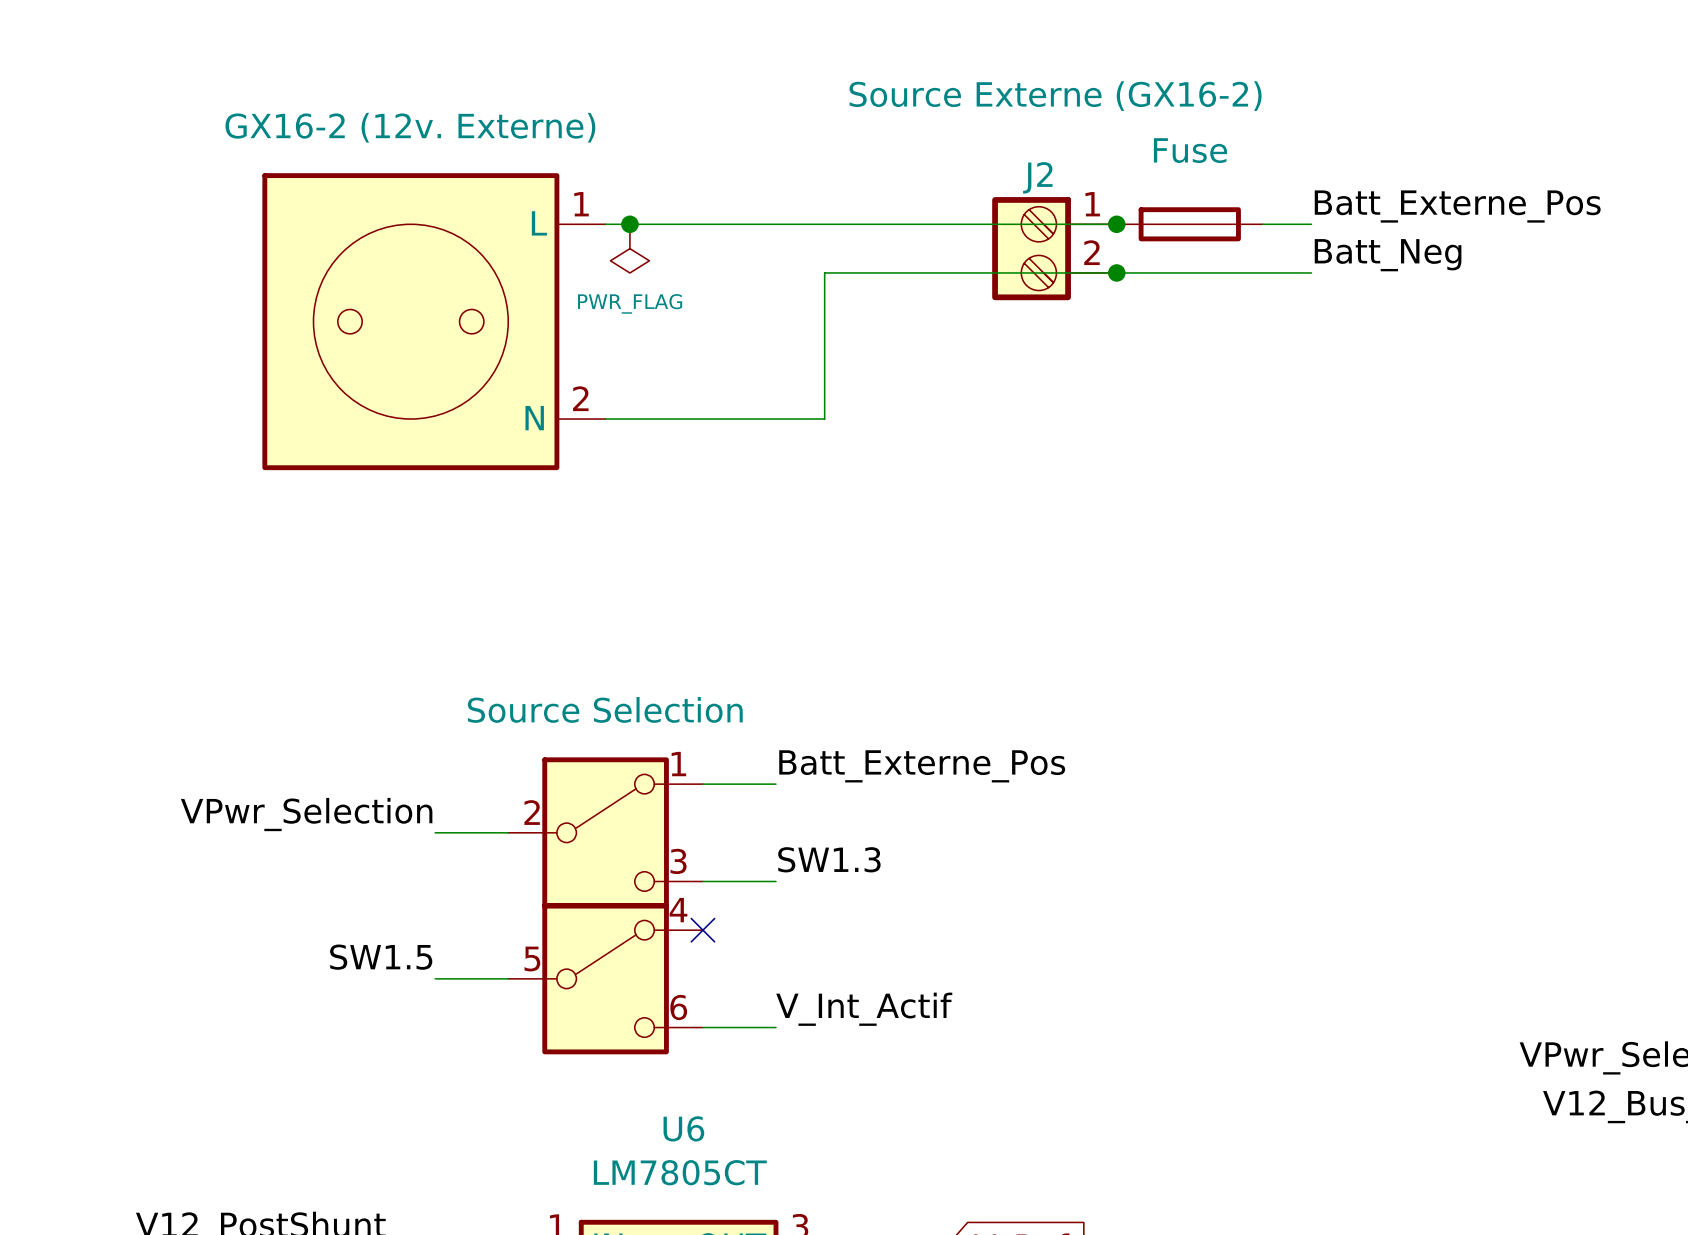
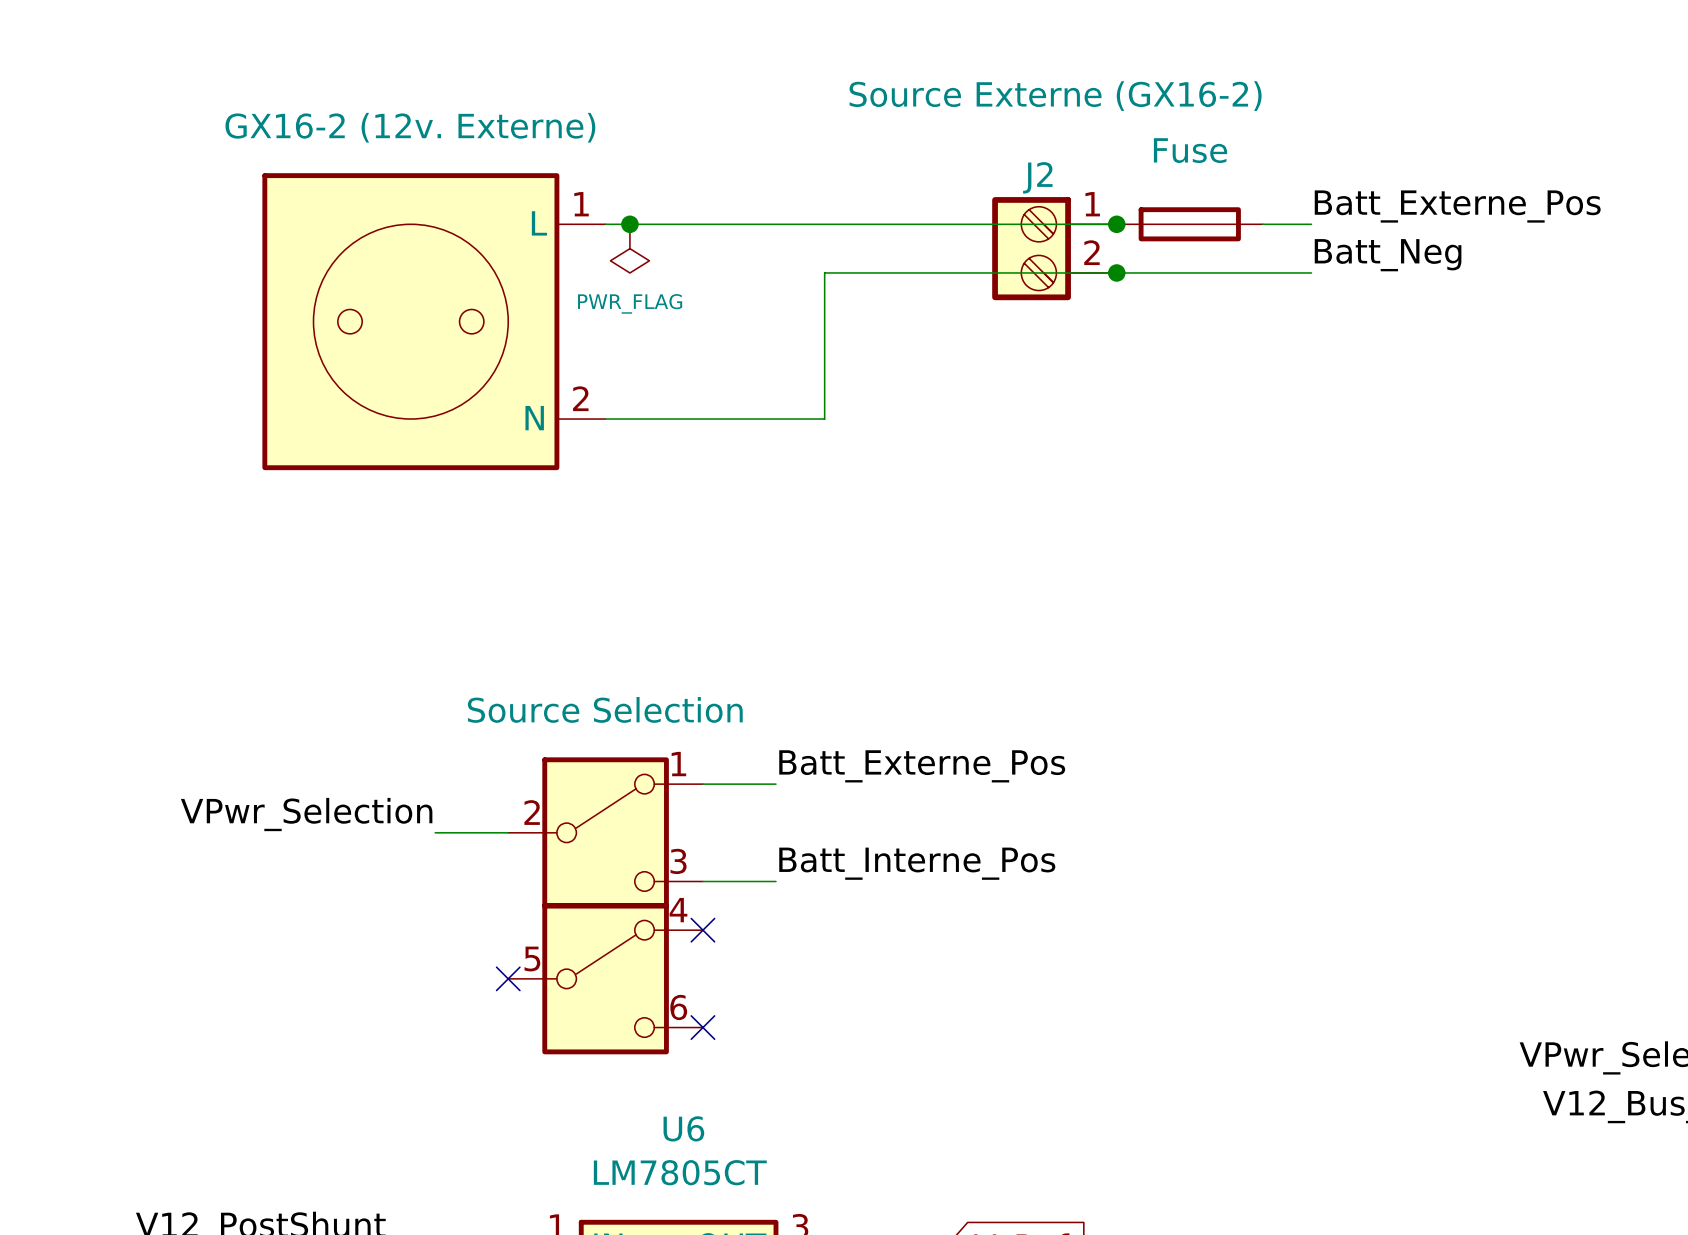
label: SW1.3 (829, 859) -> Batt_Interne_Pos (917, 863)
label: SW1.5 (381, 957) -> none
wire: (435, 978) (508, 978) -> none
no-connect mark: none -> (508, 978)
label: V_Int_Actif (864, 1009) -> none
wire: (702, 1027) (775, 1027) -> none
no-connect mark: none -> (702, 1027)

